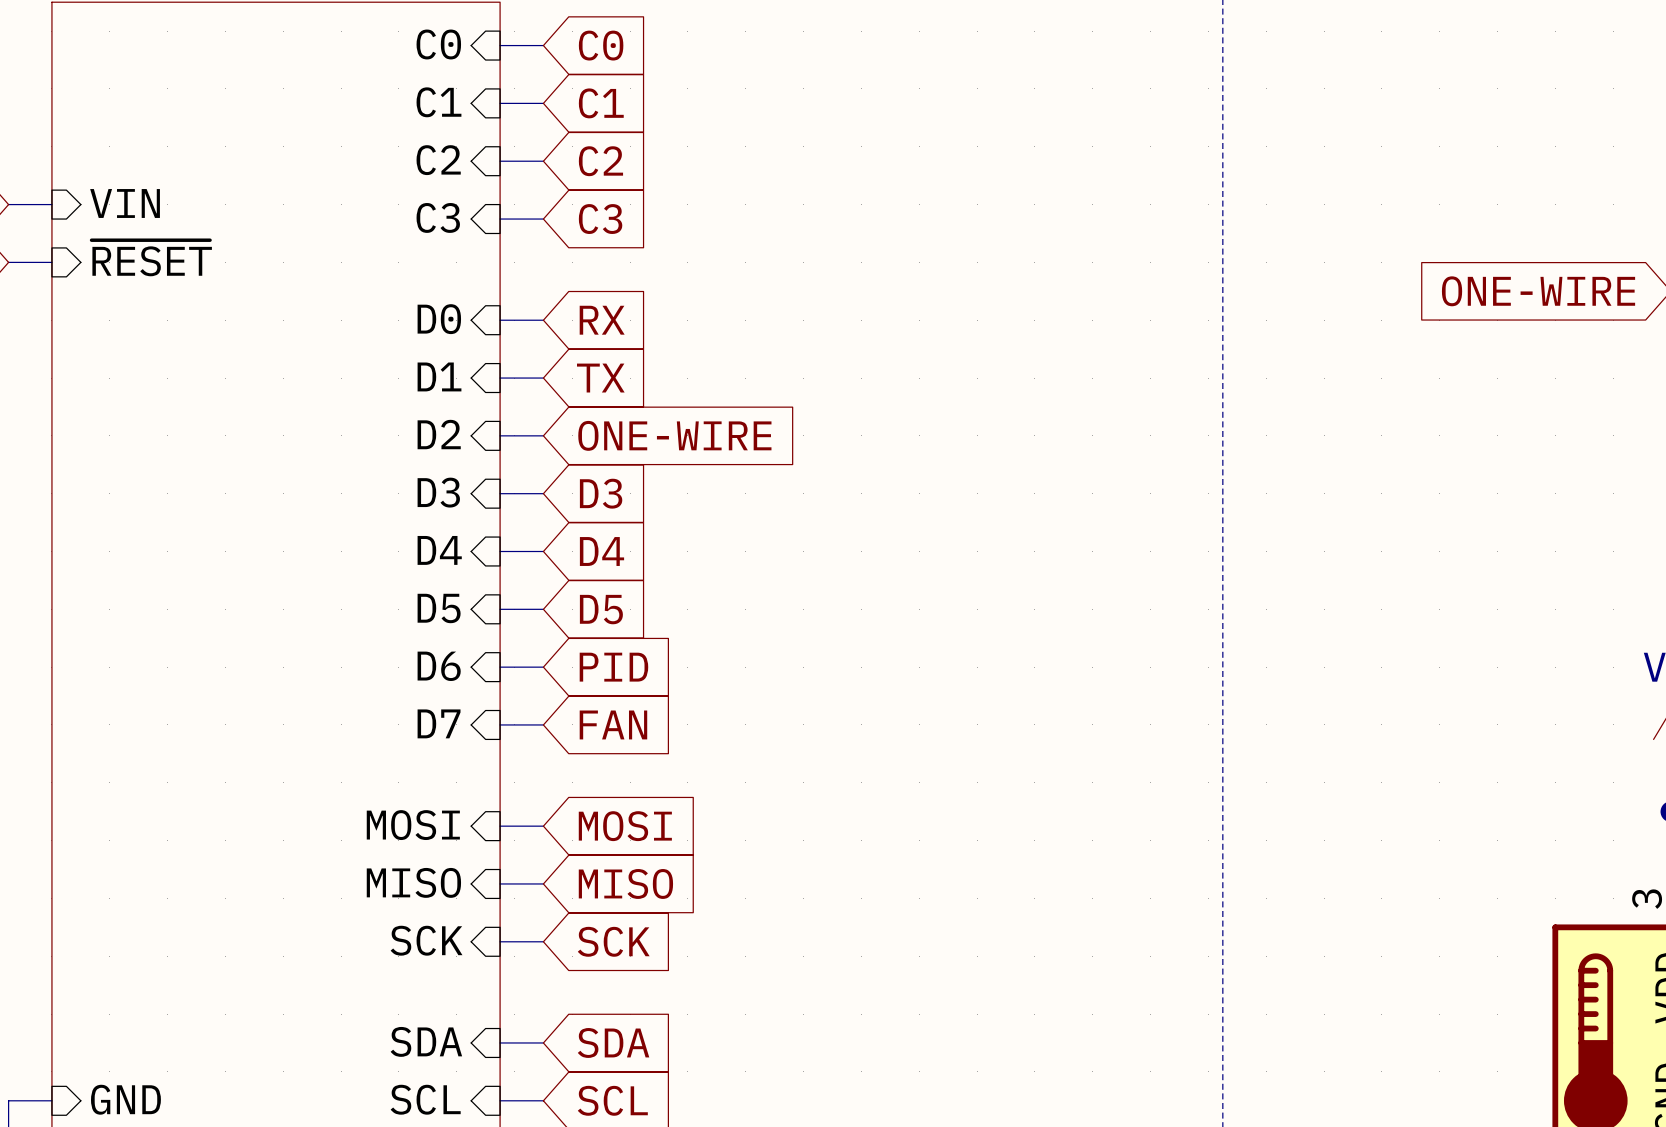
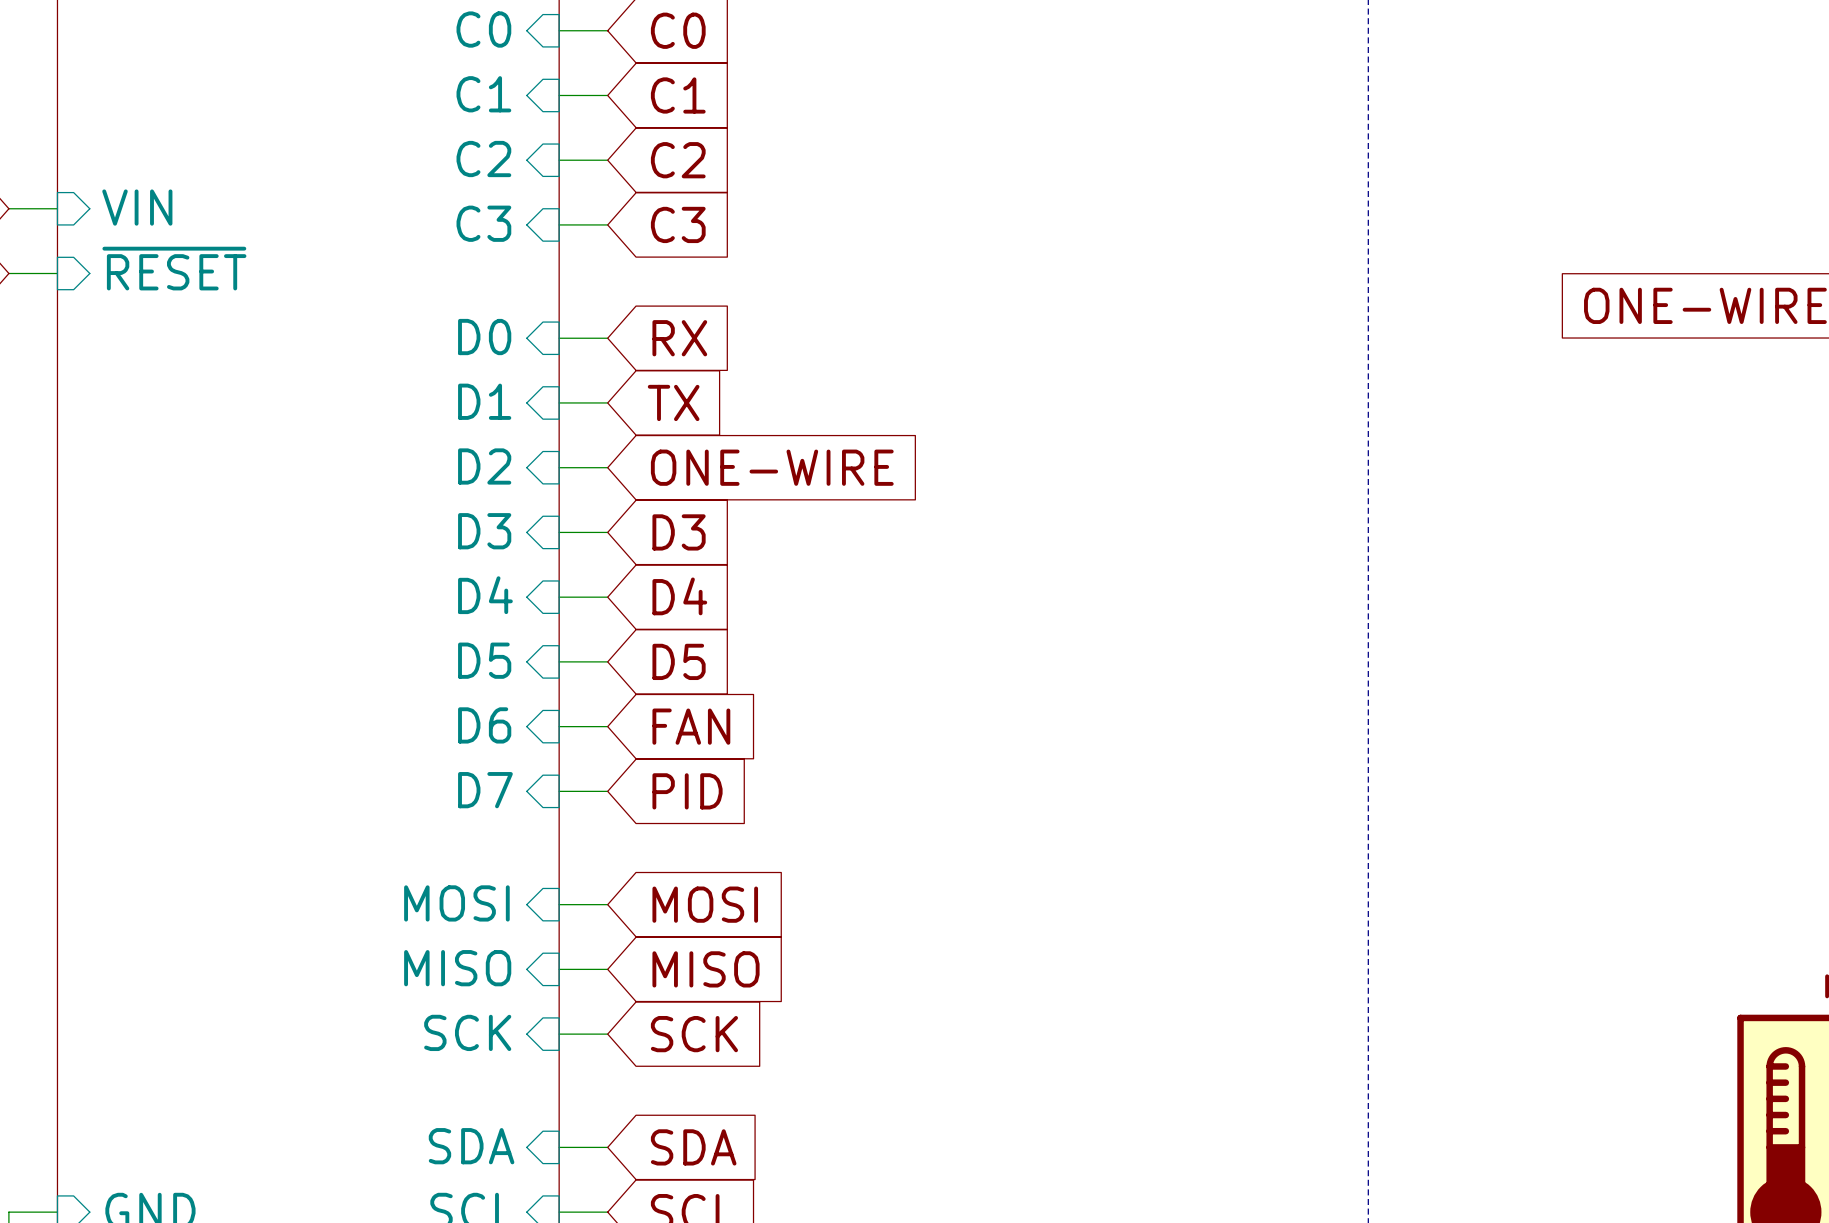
global label: PID (613, 667) -> FAN (691, 726)
global label: FAN (613, 724) -> PID (687, 791)

